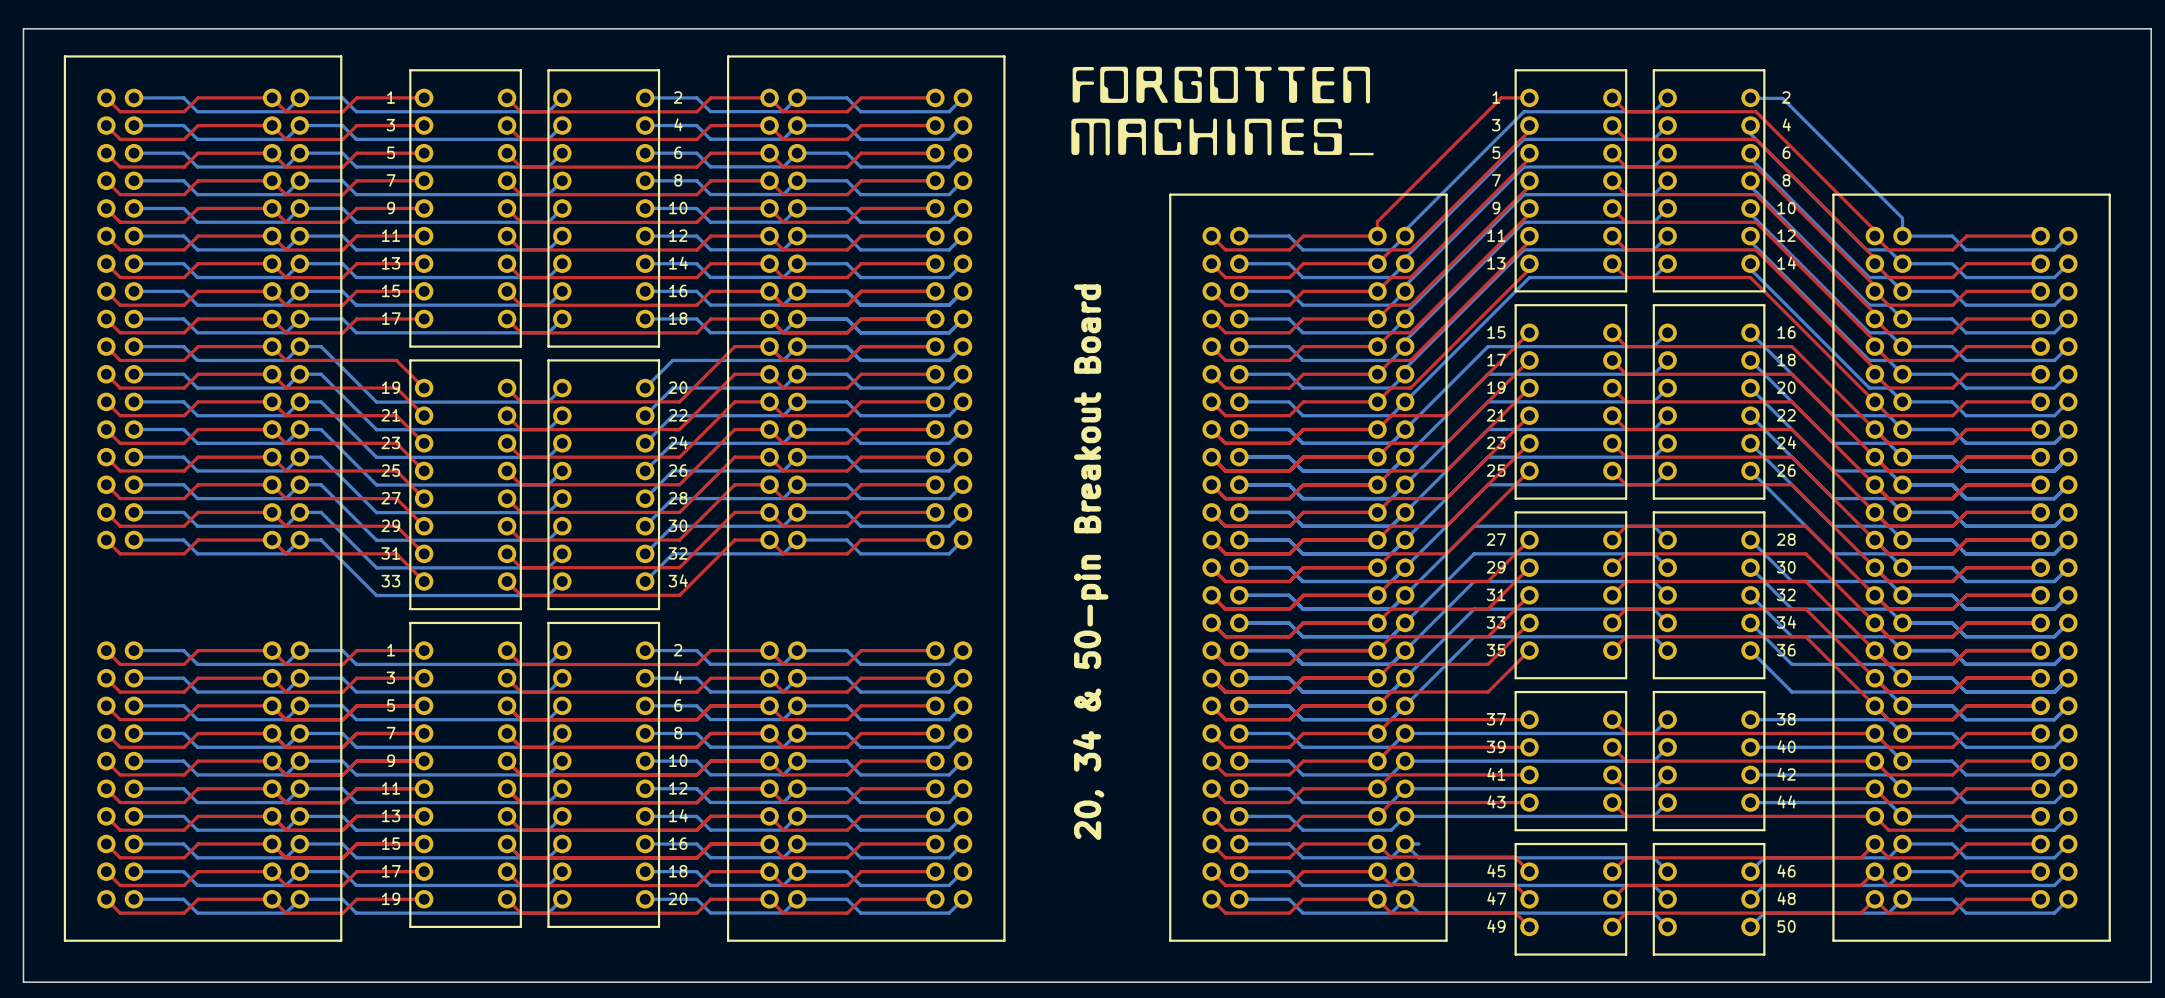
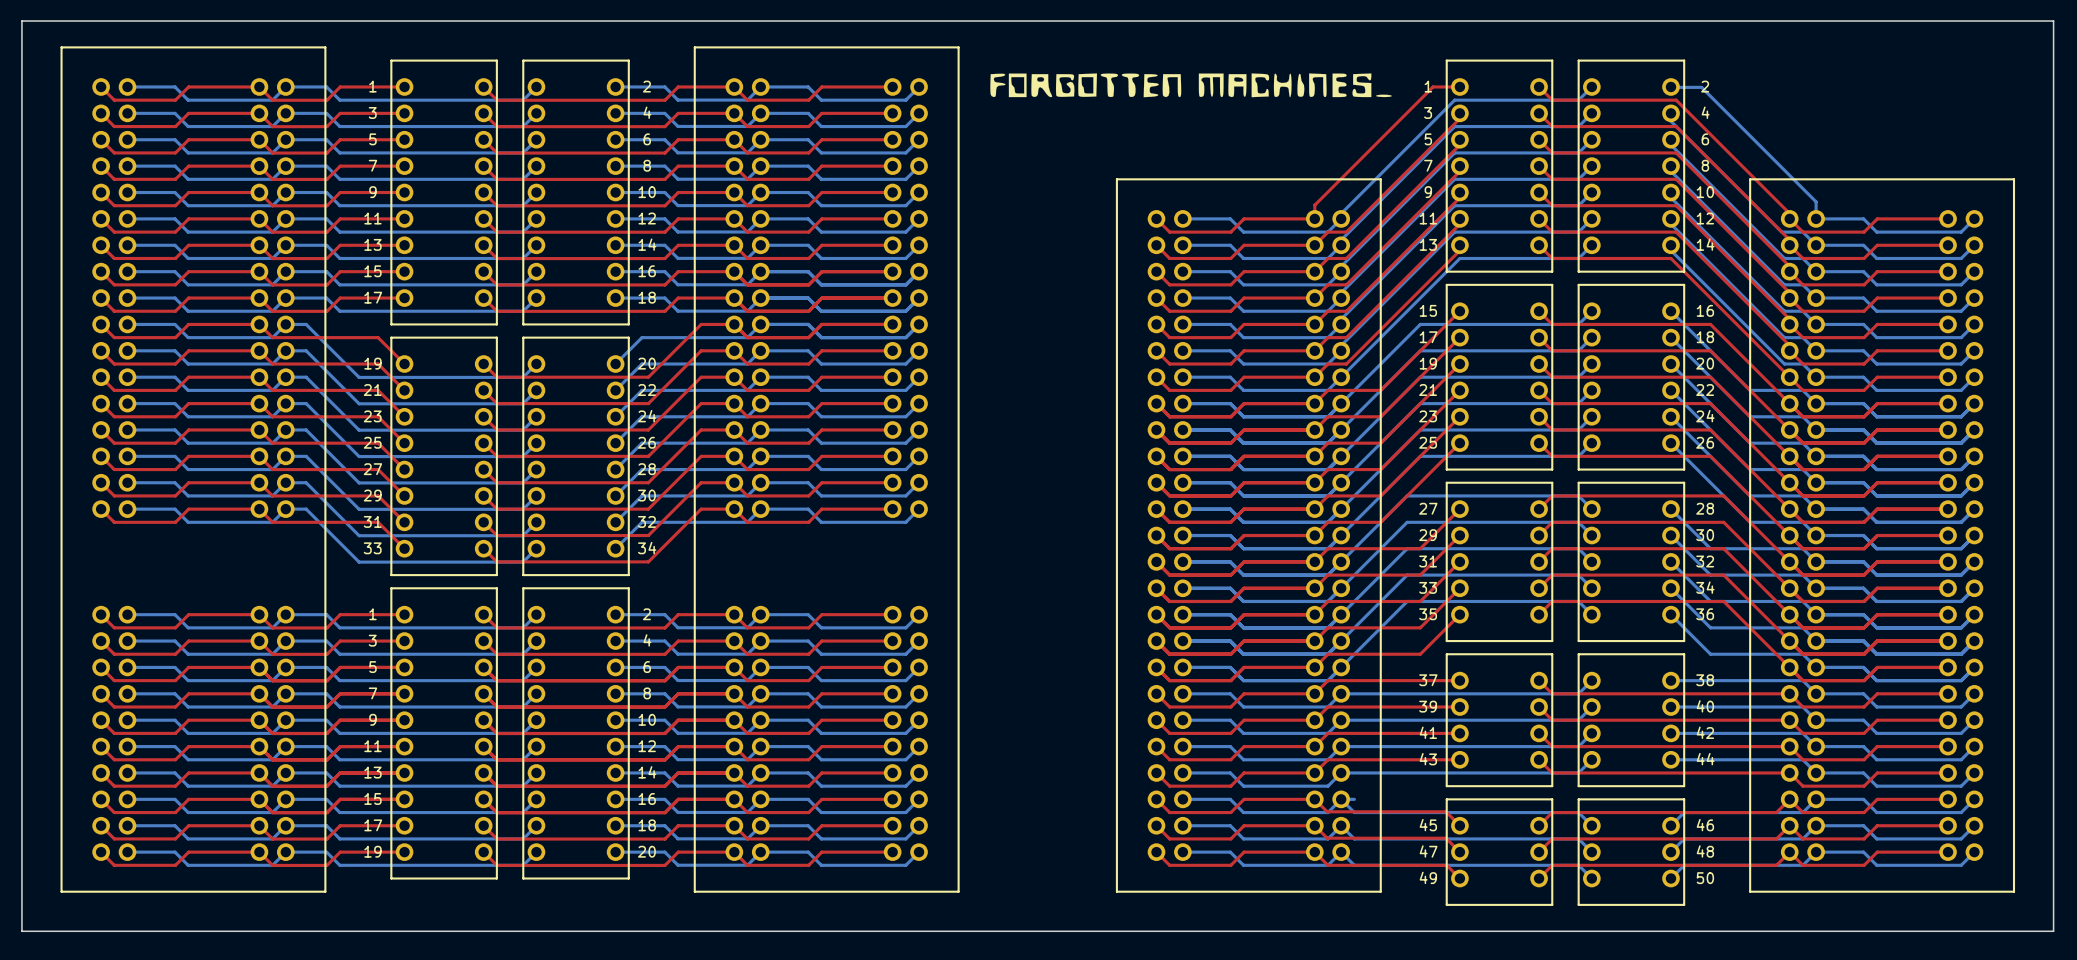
drawing: [1072, 66, 1371, 104] -> none
drawing: none -> [990, 73, 1392, 98]
drawing: [1071, 118, 1374, 156] -> none
text: 20, 34 & 50-pin Breakout Board (1090, 562) -> none

